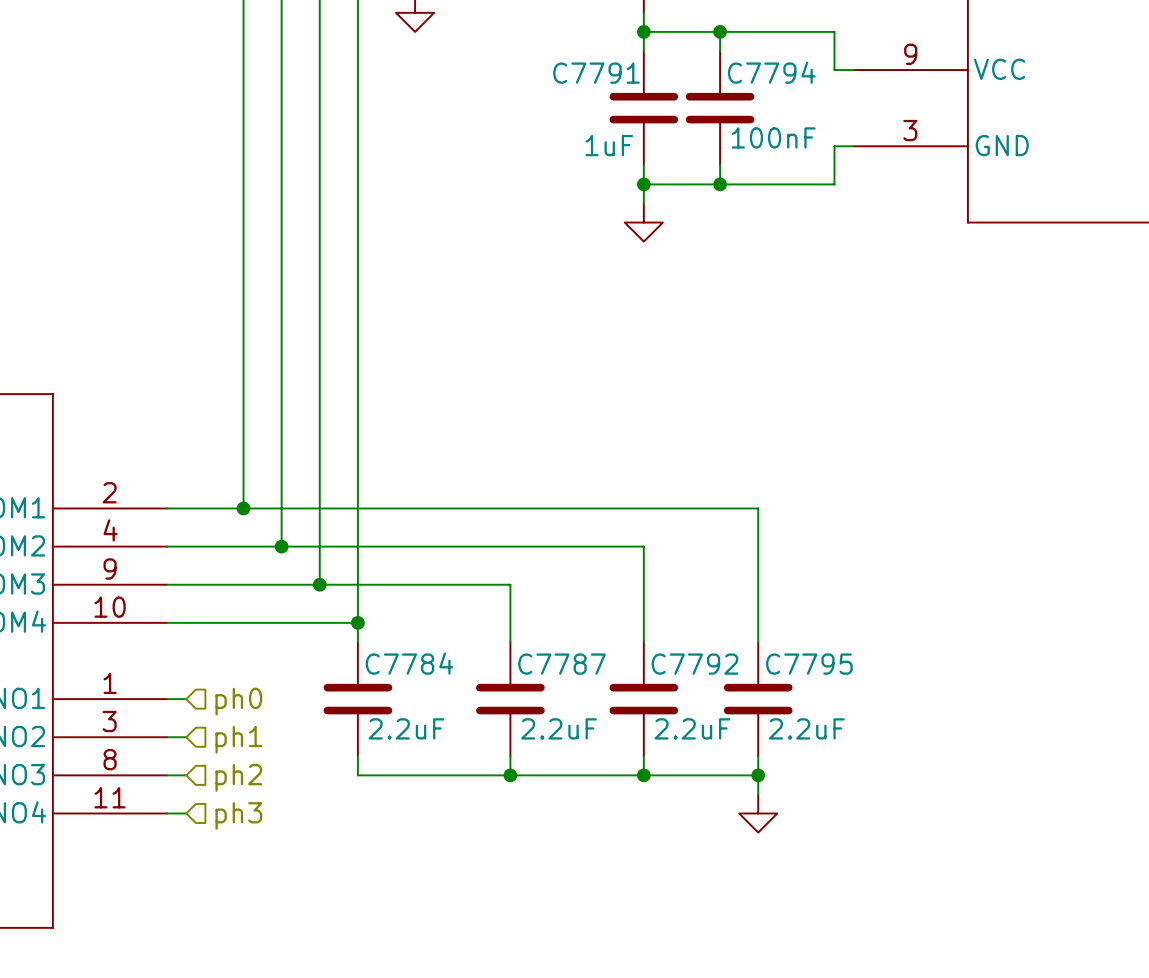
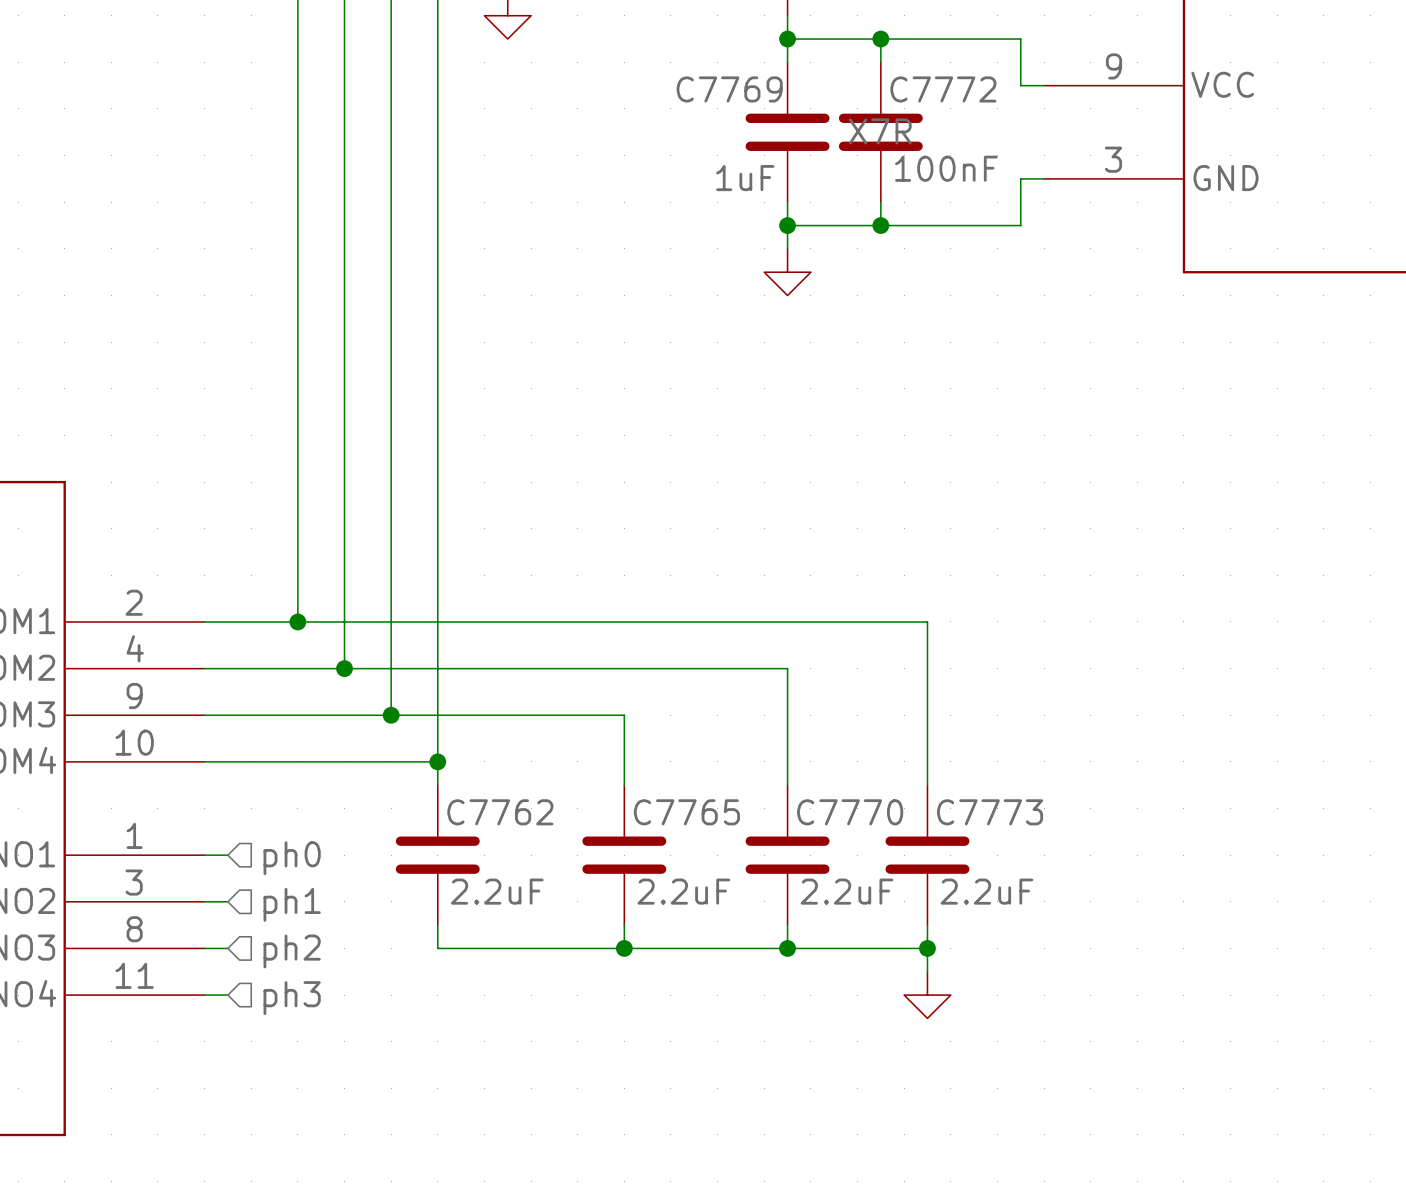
C7794 name: C7794 (771, 72) -> C7772 (943, 89)
C7791 name: C7791 (596, 73) -> C7769 (729, 89)
C7794 text: none -> X7R (880, 131)
C7784 name: C7784 (409, 663) -> C7762 (500, 812)
C7787 name: C7787 (562, 664) -> C7765 (686, 812)
C7792 name: C7792 (695, 664) -> C7770 (850, 812)
C7795 name: C7795 (809, 664) -> C7773 (990, 812)

